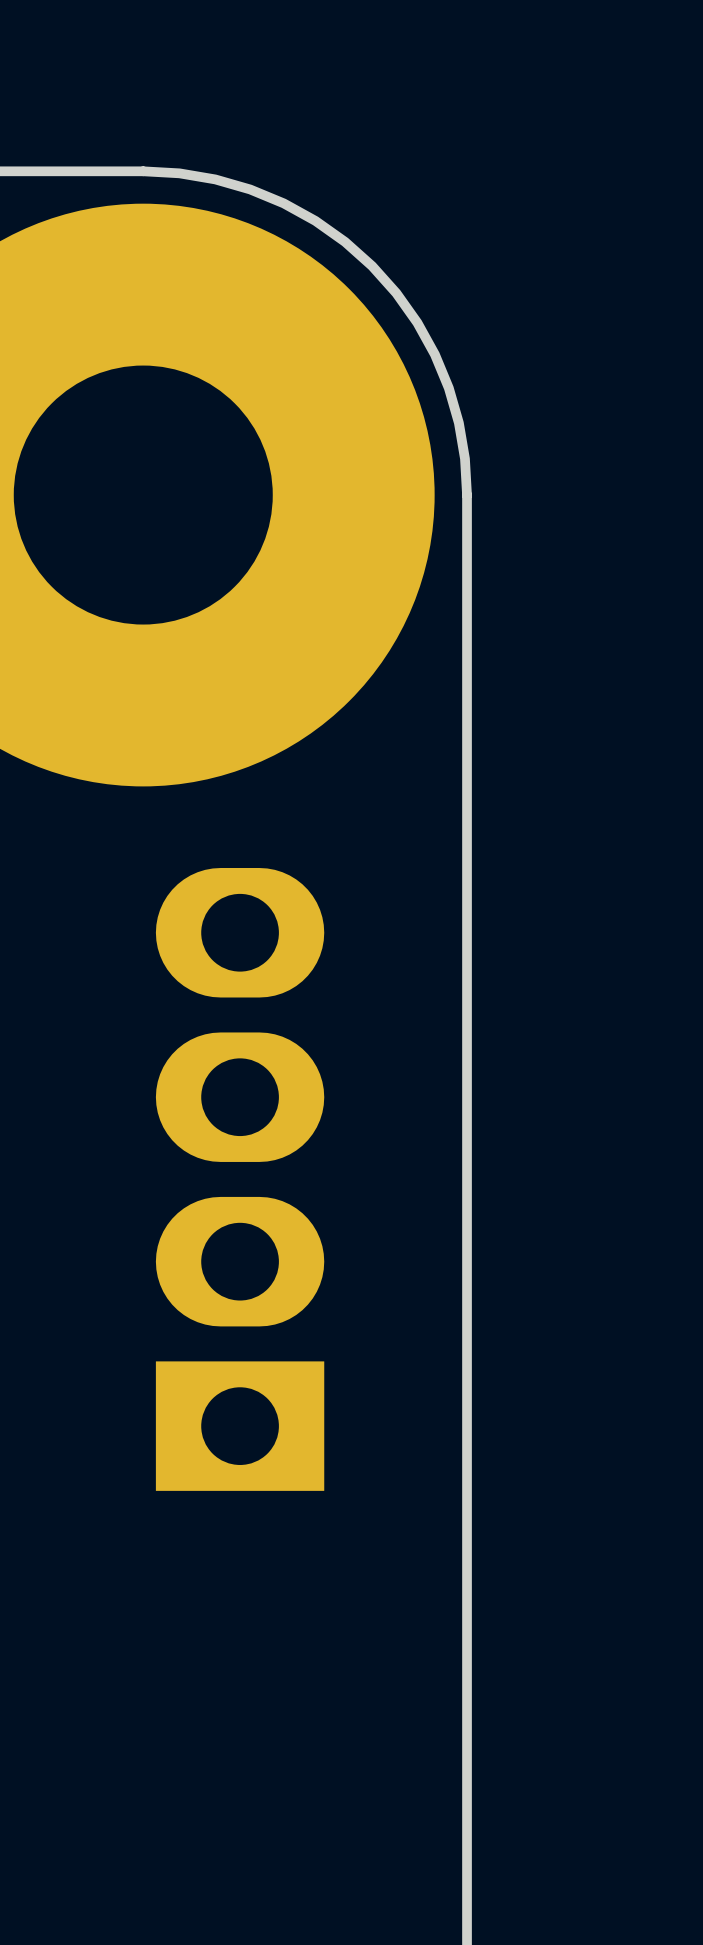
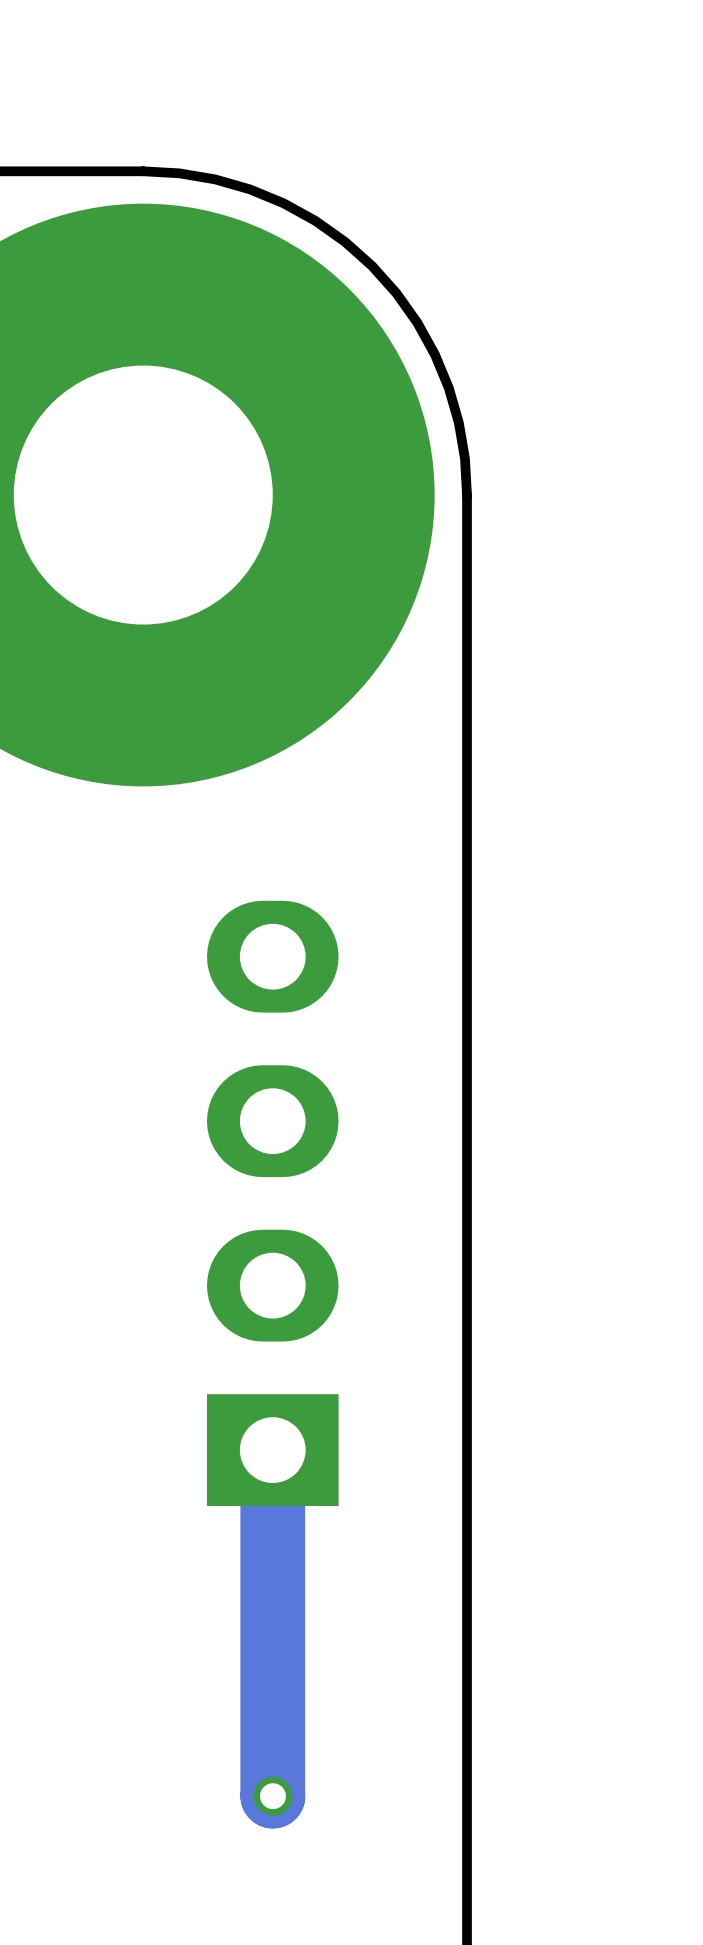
part footprint: [155, 868, 325, 1491] -> [206, 900, 339, 1507]
track: none -> (272, 1450) (272, 1795)
via: none -> (272, 1796)

